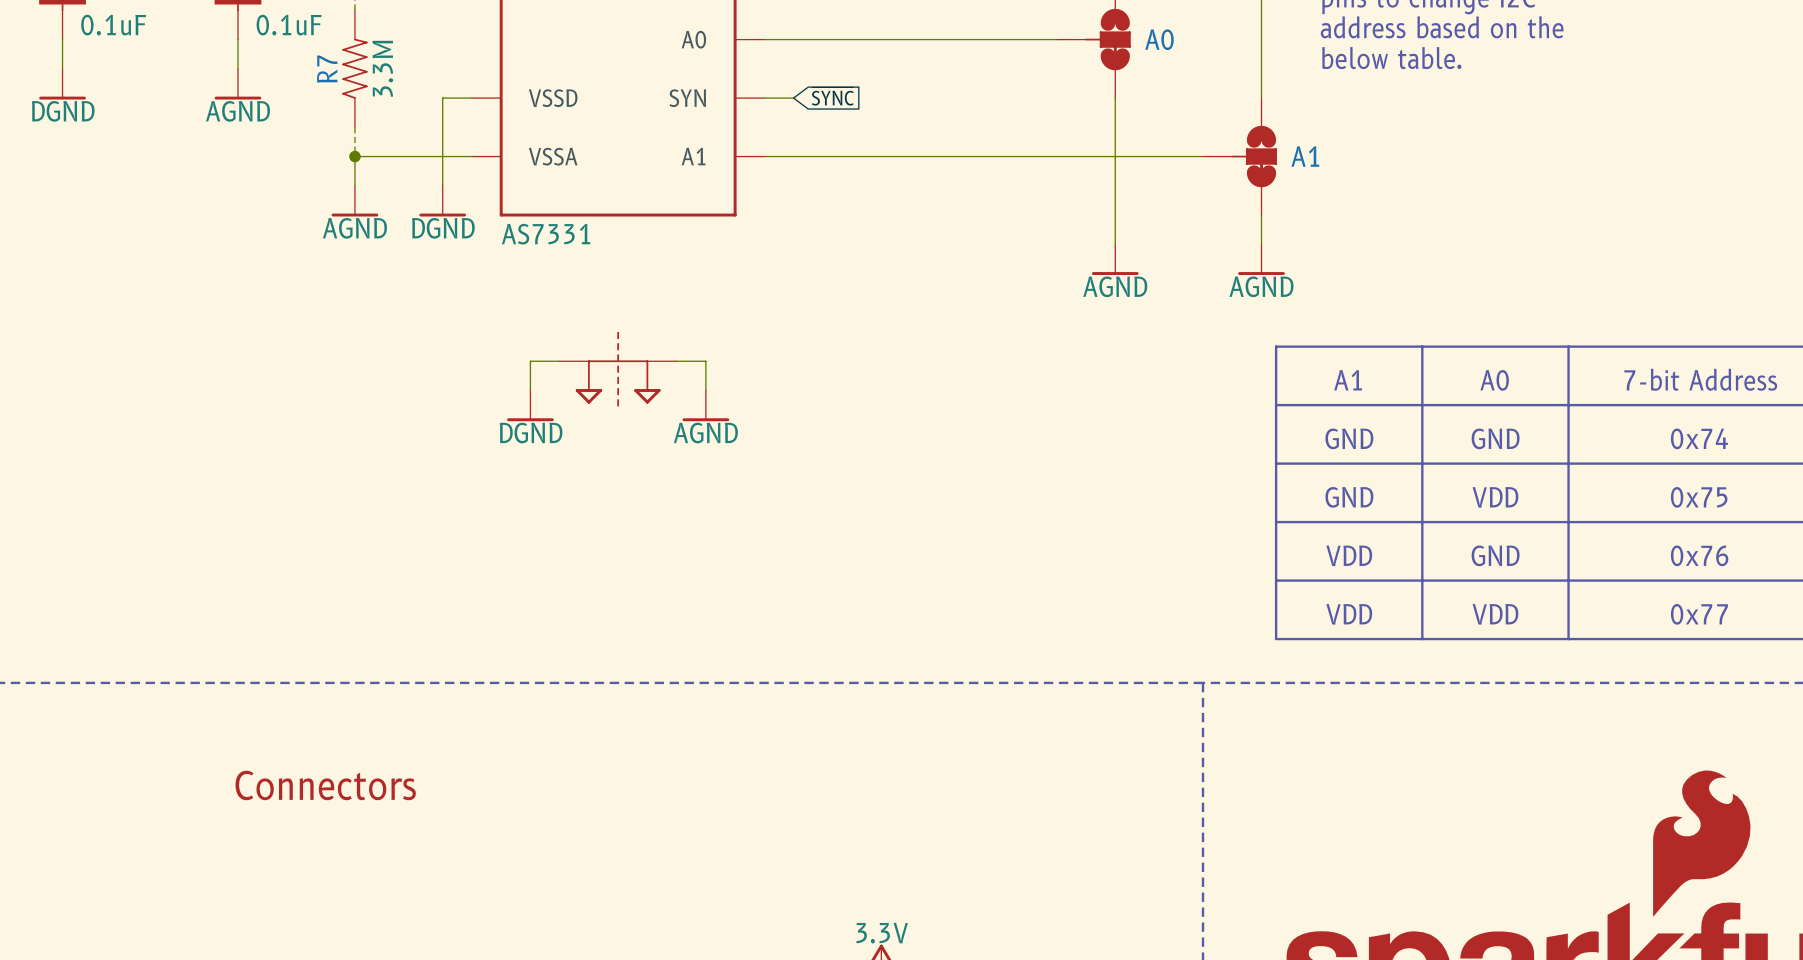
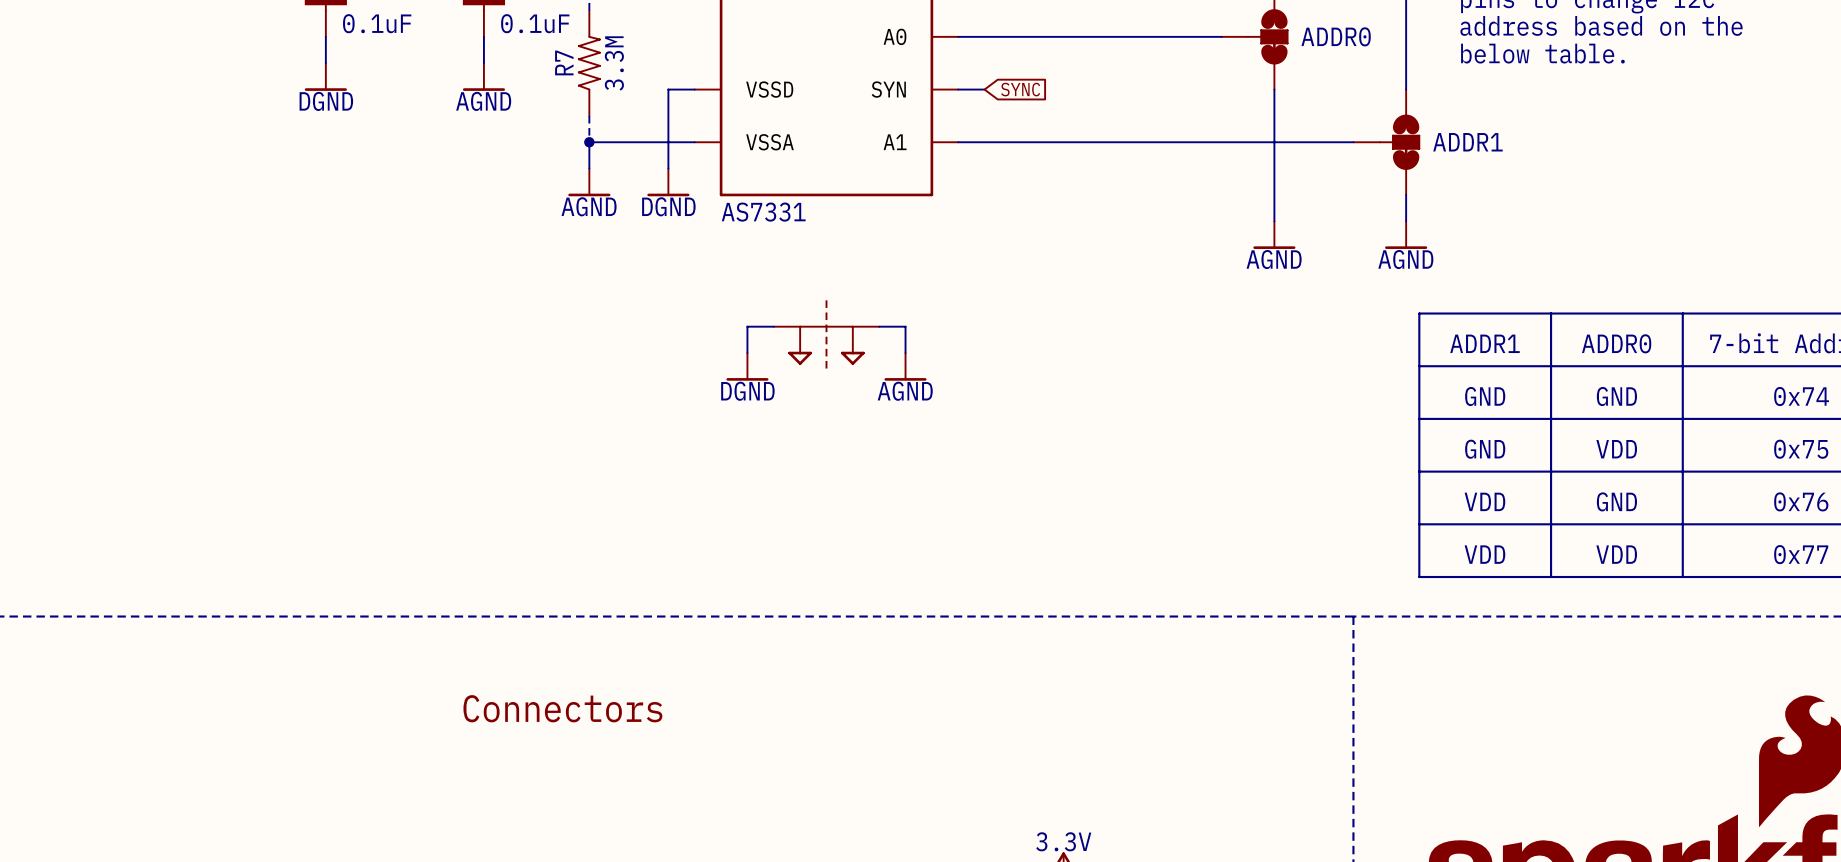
A0 name: A0 (1159, 39) -> ADDR0 (1336, 36)
global label: ~{SYNC} (832, 96) -> SYNC (1020, 89)
A1 name: A1 (1305, 156) -> ADDR1 (1467, 142)
text: A1 (1348, 380) -> ADDR1 (1484, 343)
text: A0 (1494, 380) -> ADDR0 (1616, 343)

